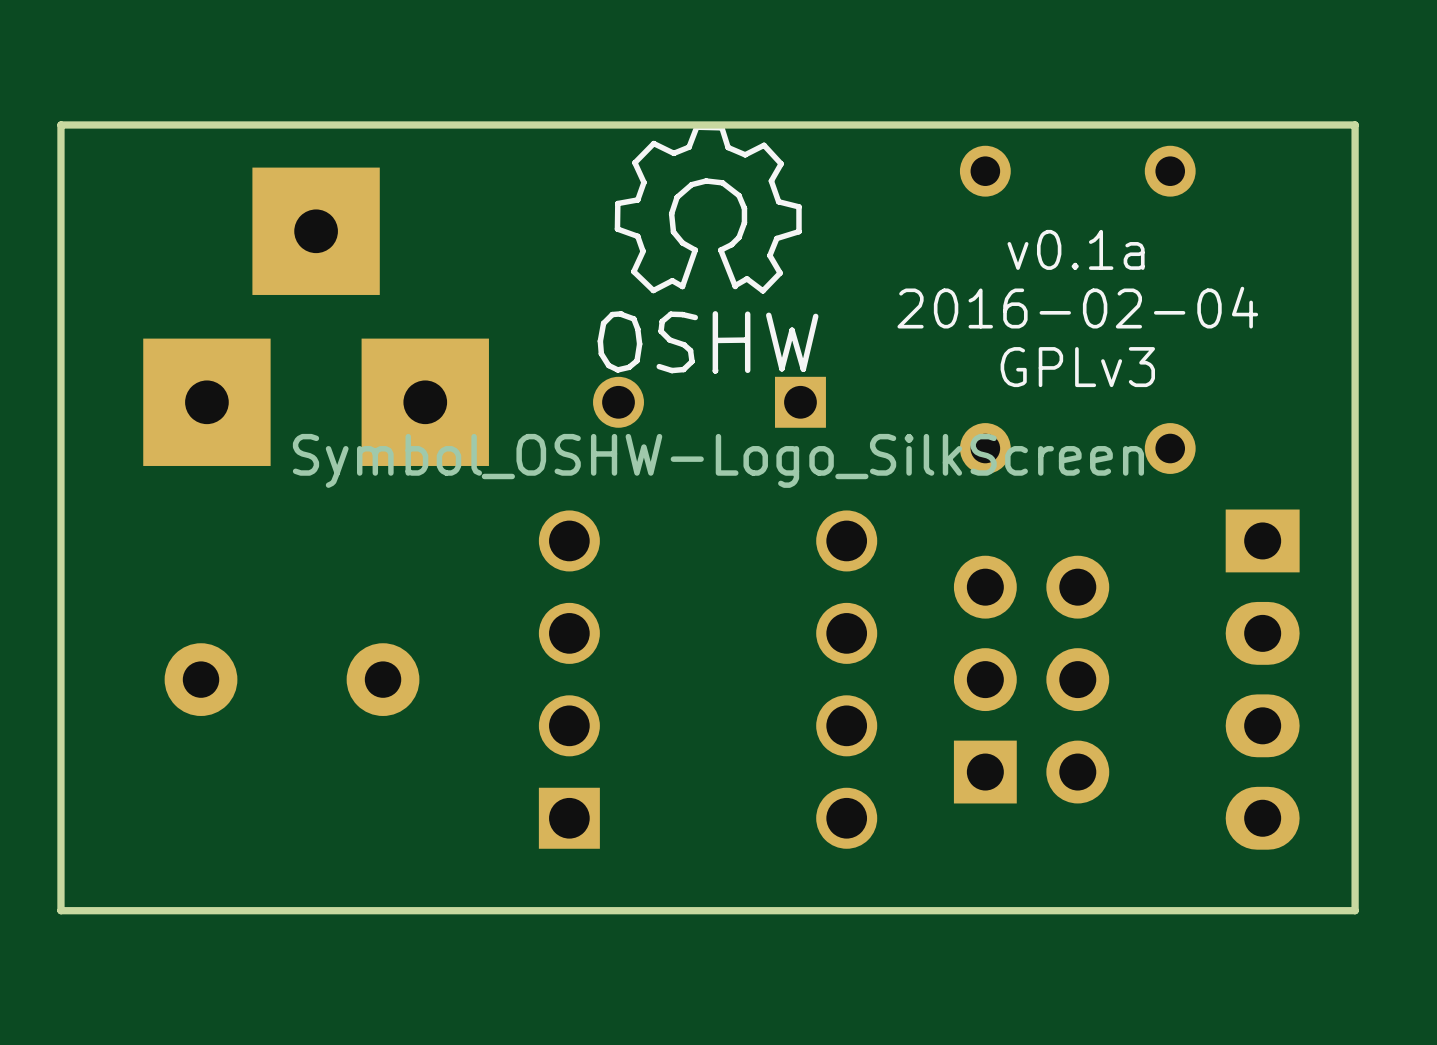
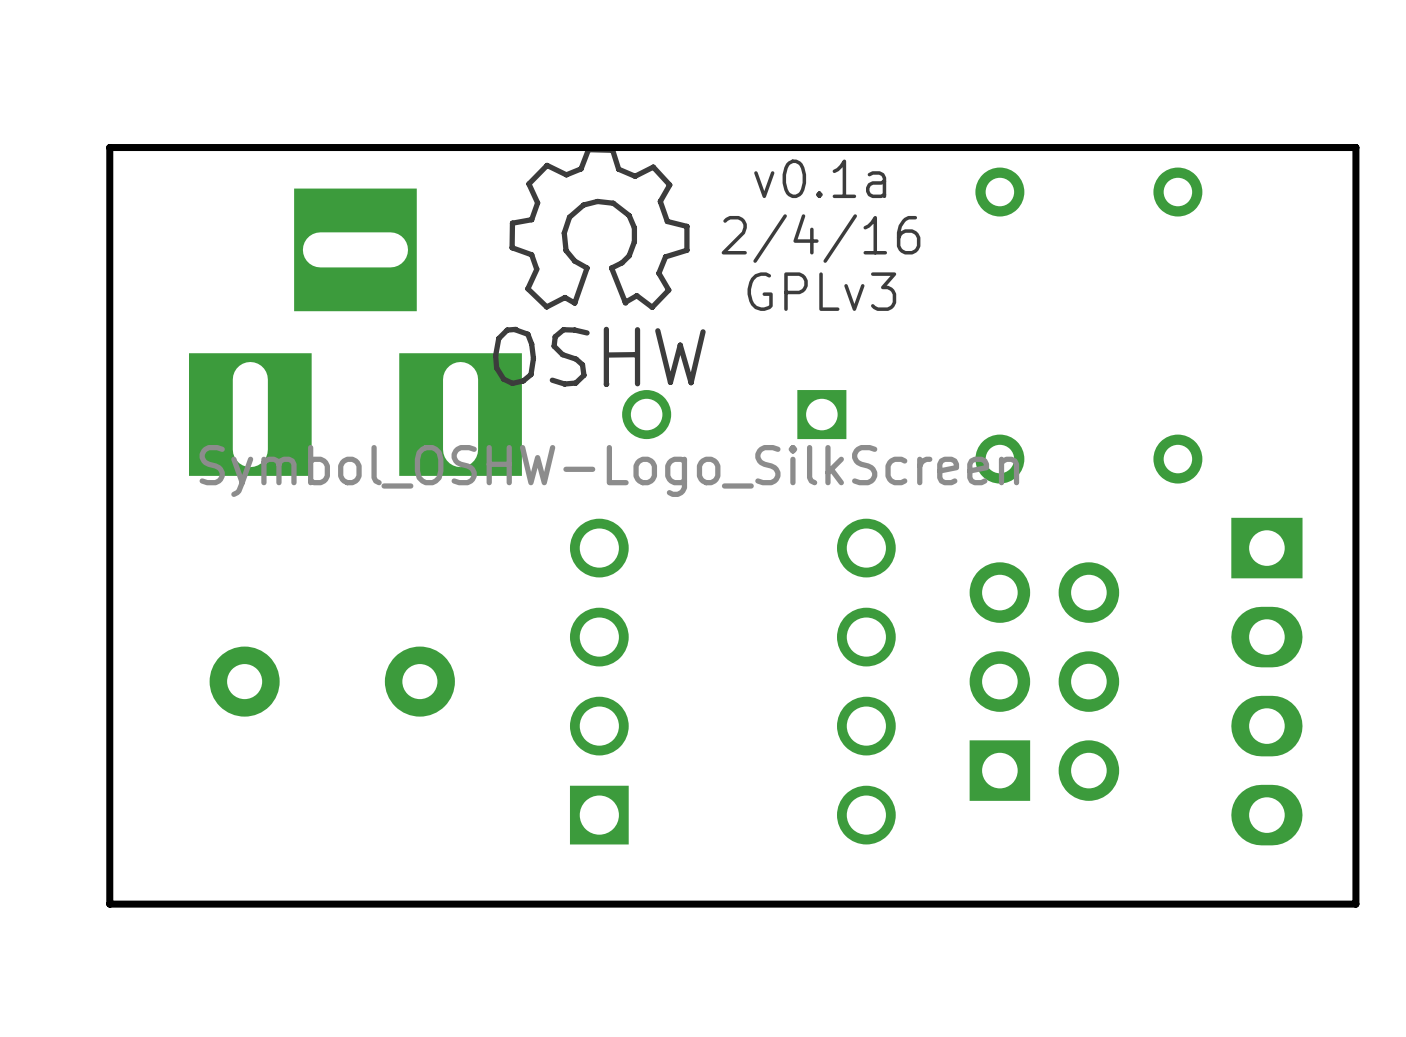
part footprint: [143, 167, 489, 466] -> [189, 188, 522, 476]
text: none -> 2/4/16 (821, 238)
drawing position: (708, 249) -> (599, 267)
text position: v0.1a (1076, 249) -> v0.1a (820, 178)
text: 2016-02-04 (1077, 307) -> none
text position: GPLv3 (1077, 367) -> GPLv3 (821, 291)

